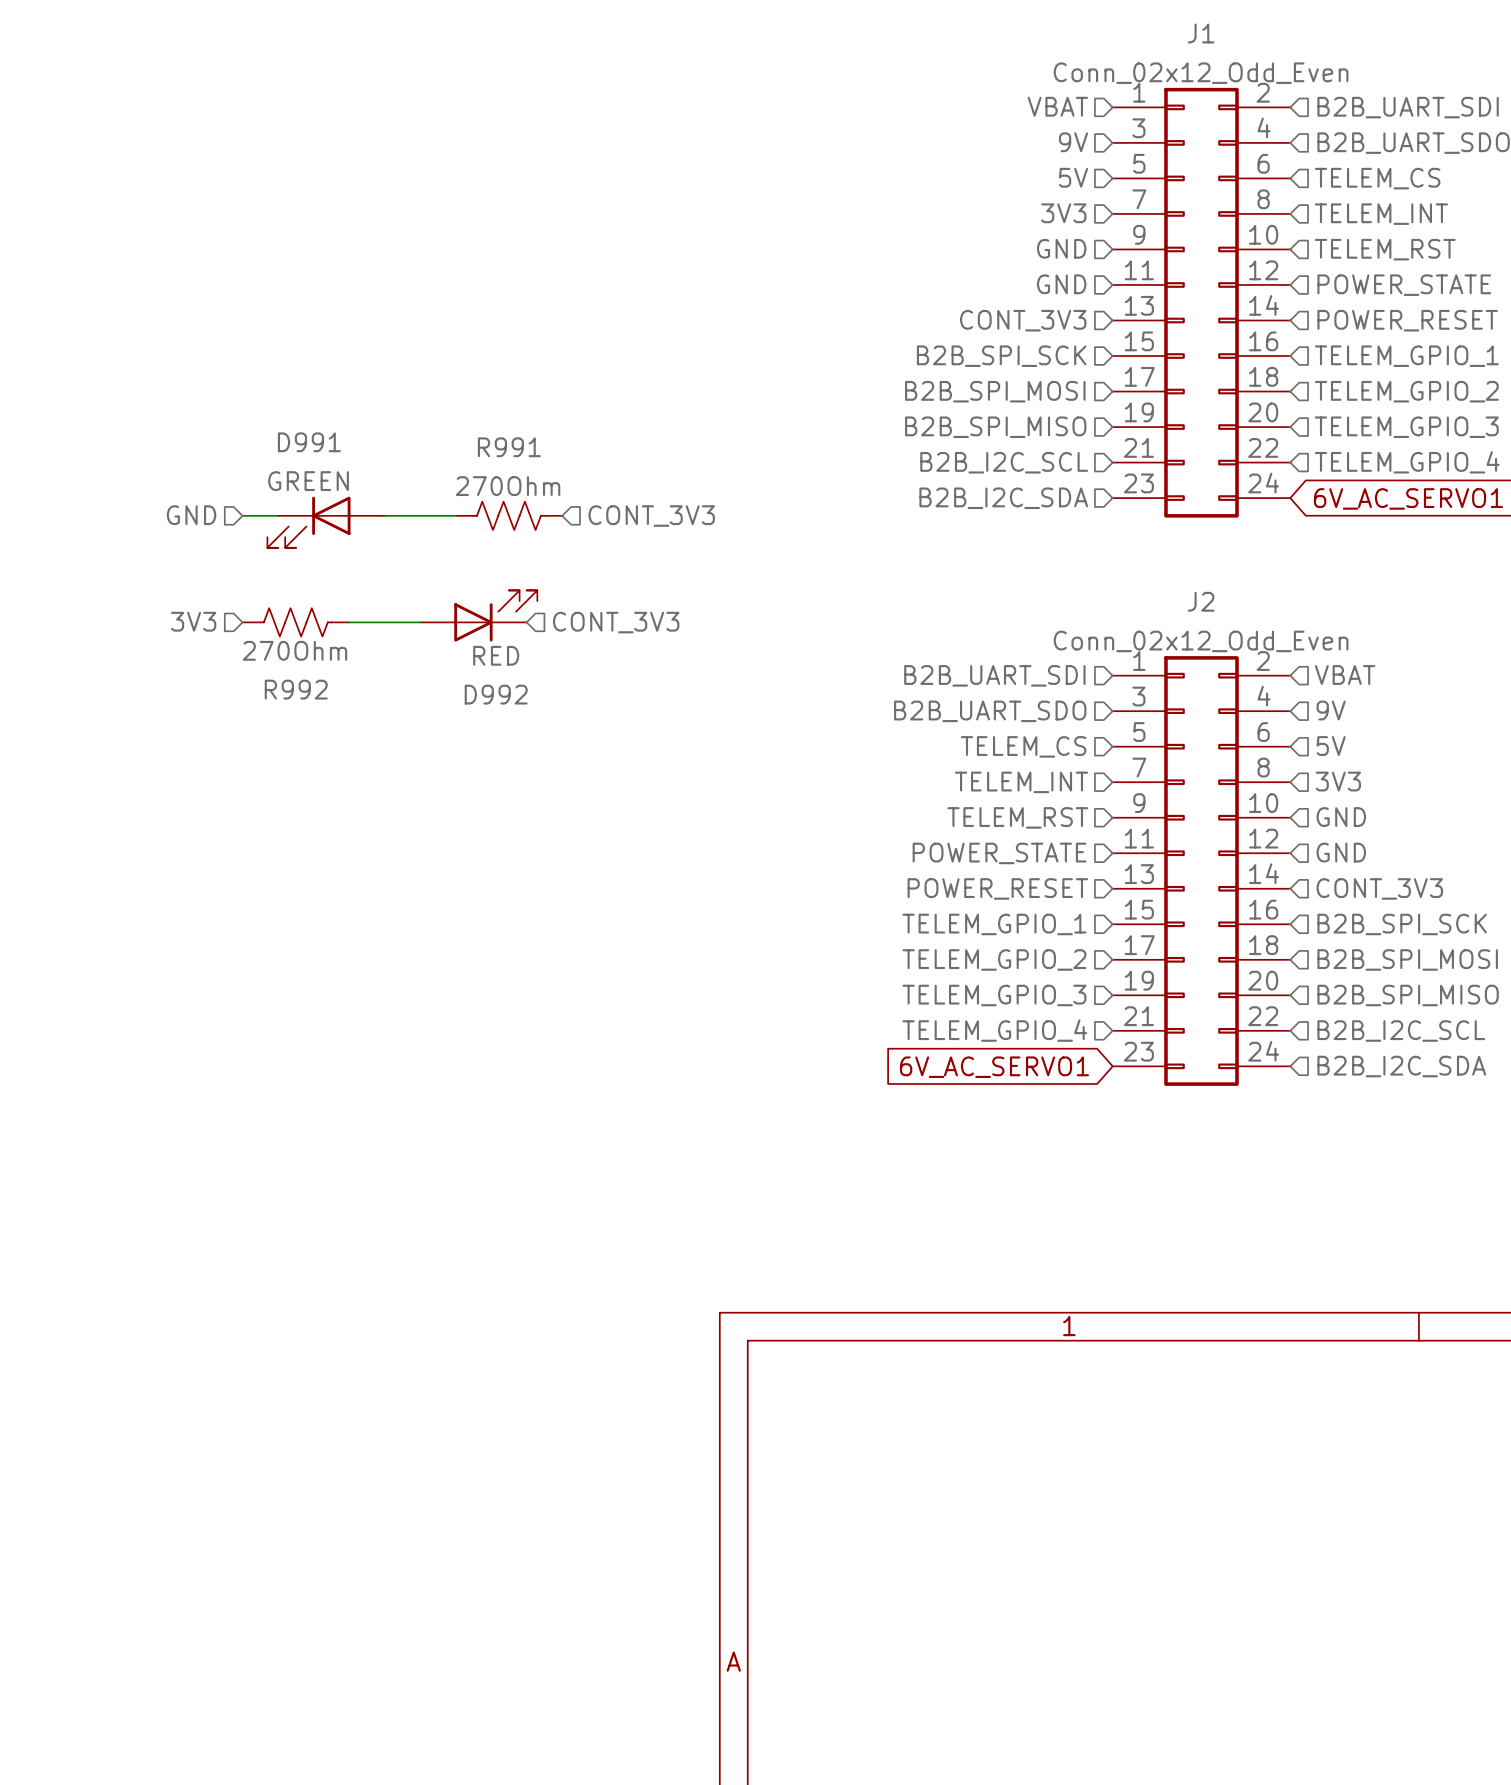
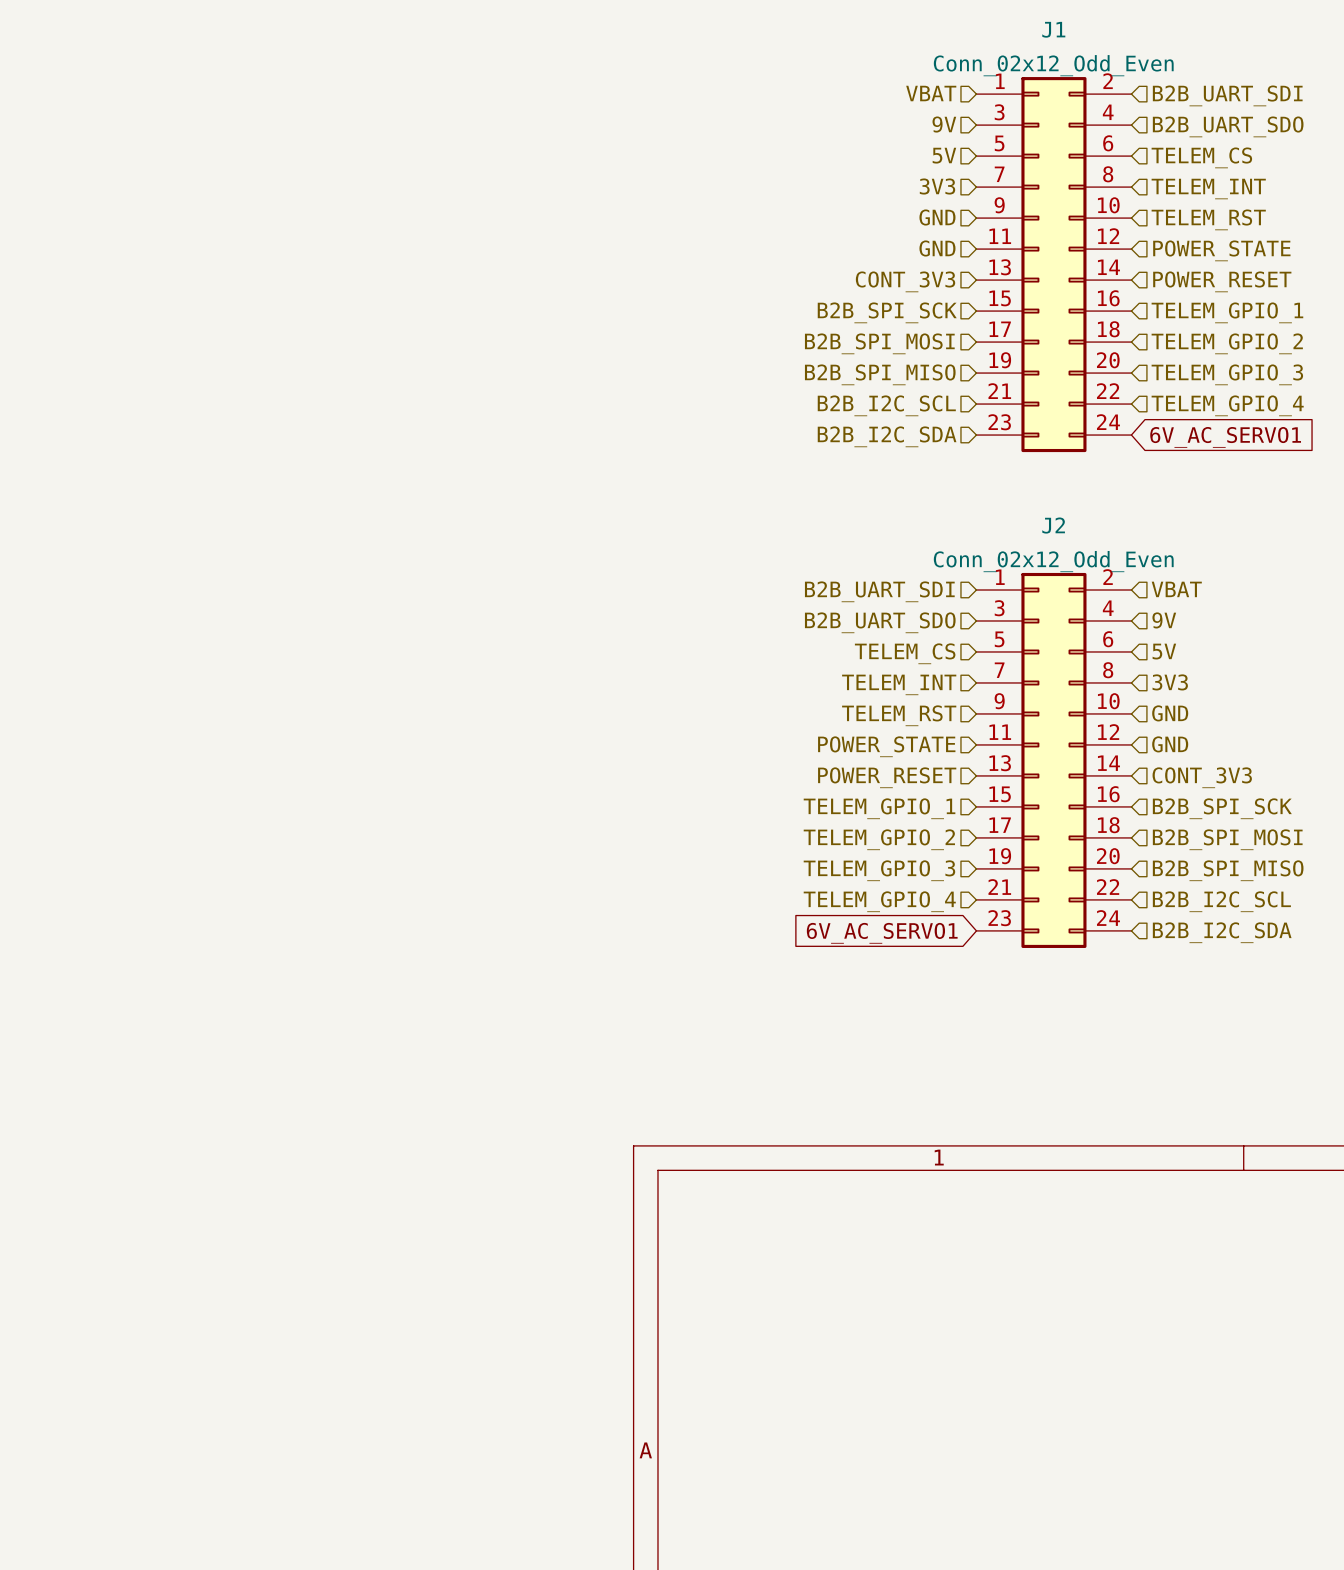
hierarchical label: GND (191, 515) -> none
wire: (242, 515) (278, 515) -> none
wire: (384, 515) (455, 515) -> none
R991: 270Ohm (508, 515) -> none
hierarchical label: CONT_3V3 (651, 516) -> none
D991: GREEN (326, 522) -> none
D992: RED (478, 615) -> none
hierarchical label: 3V3 (193, 621) -> none
R992: 270Ohm (295, 622) -> none
wire: (349, 622) (420, 622) -> none
hierarchical label: CONT_3V3 (616, 622) -> none

